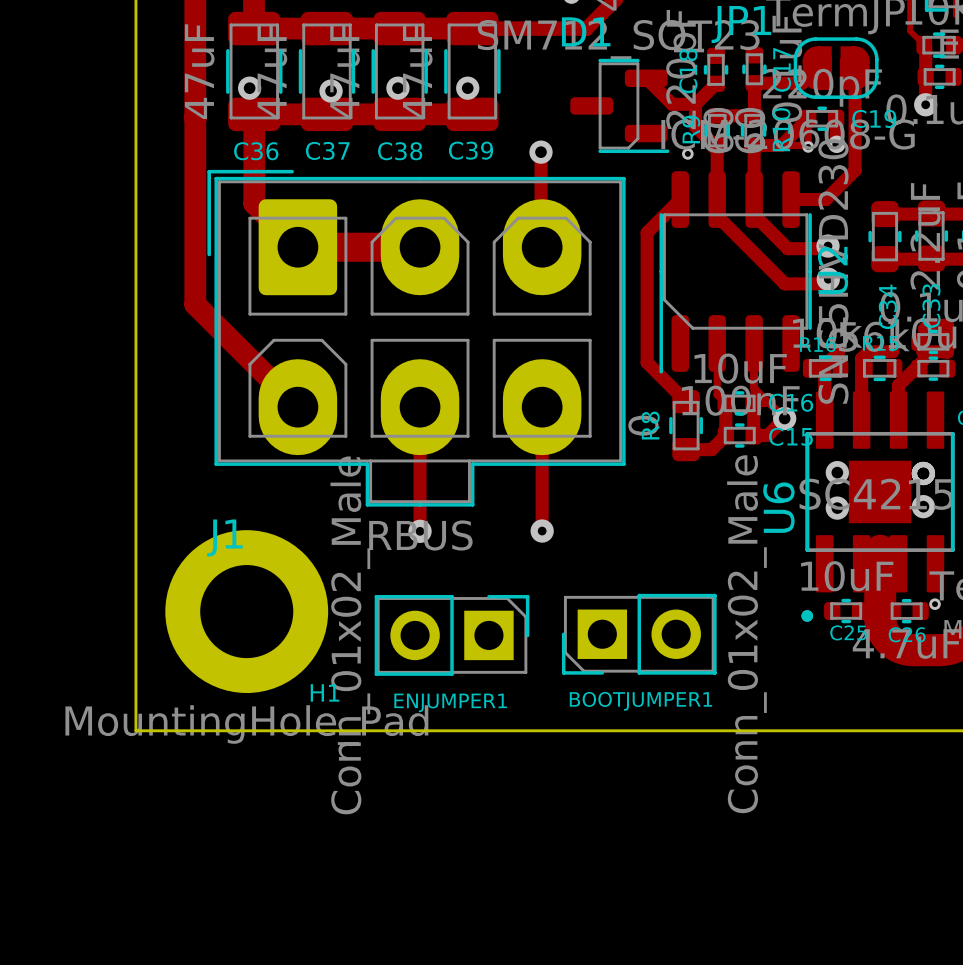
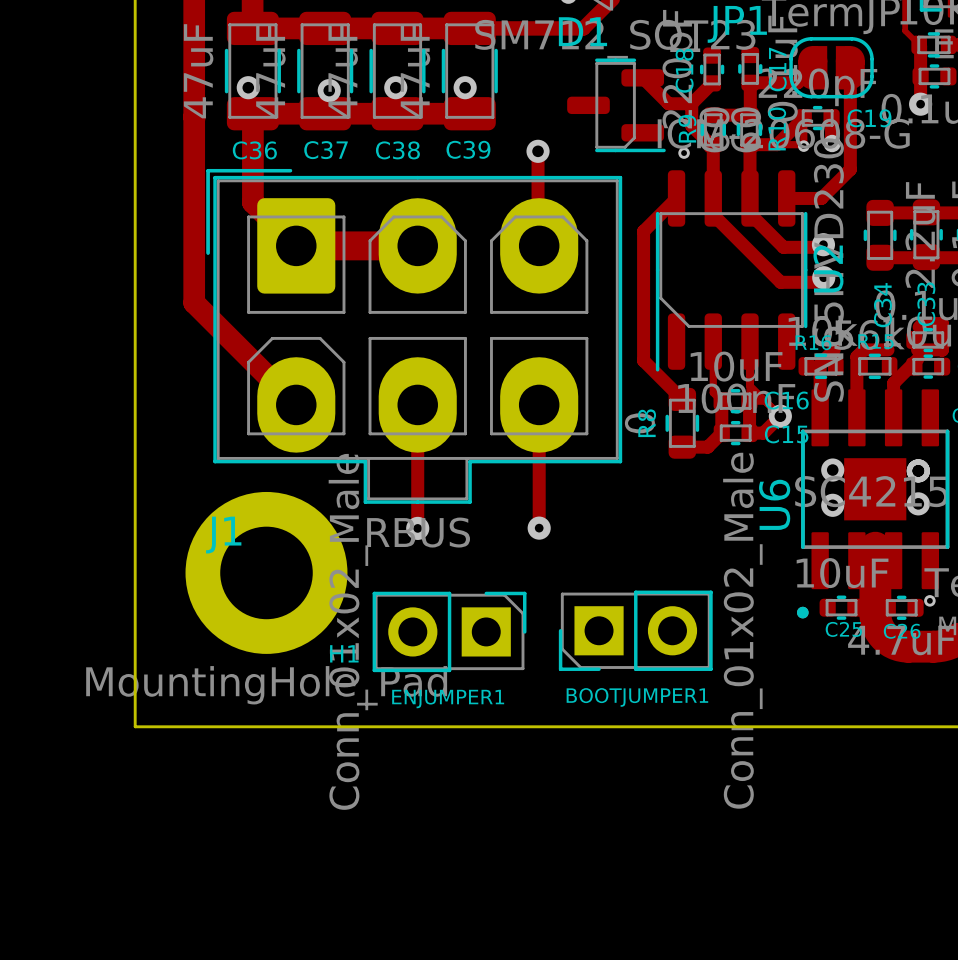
H1 position: (246, 611) -> (266, 572)

